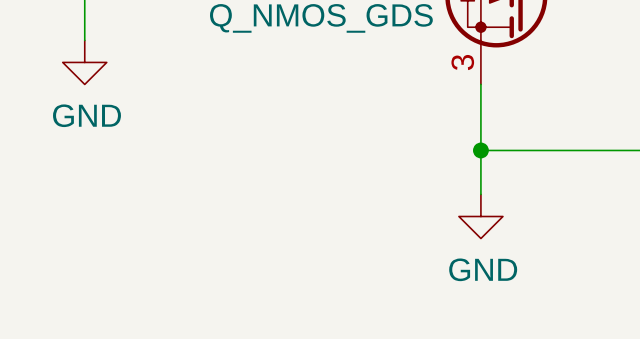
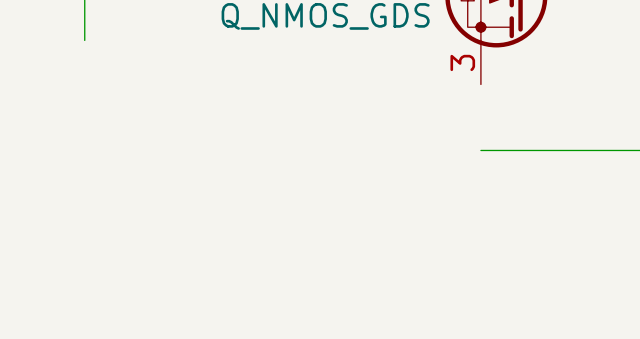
power symbol: GND (84, 62) -> none
wire: (480, 84) (480, 194) -> none
junction: (480, 150) -> none
power symbol: GND (480, 216) -> none

